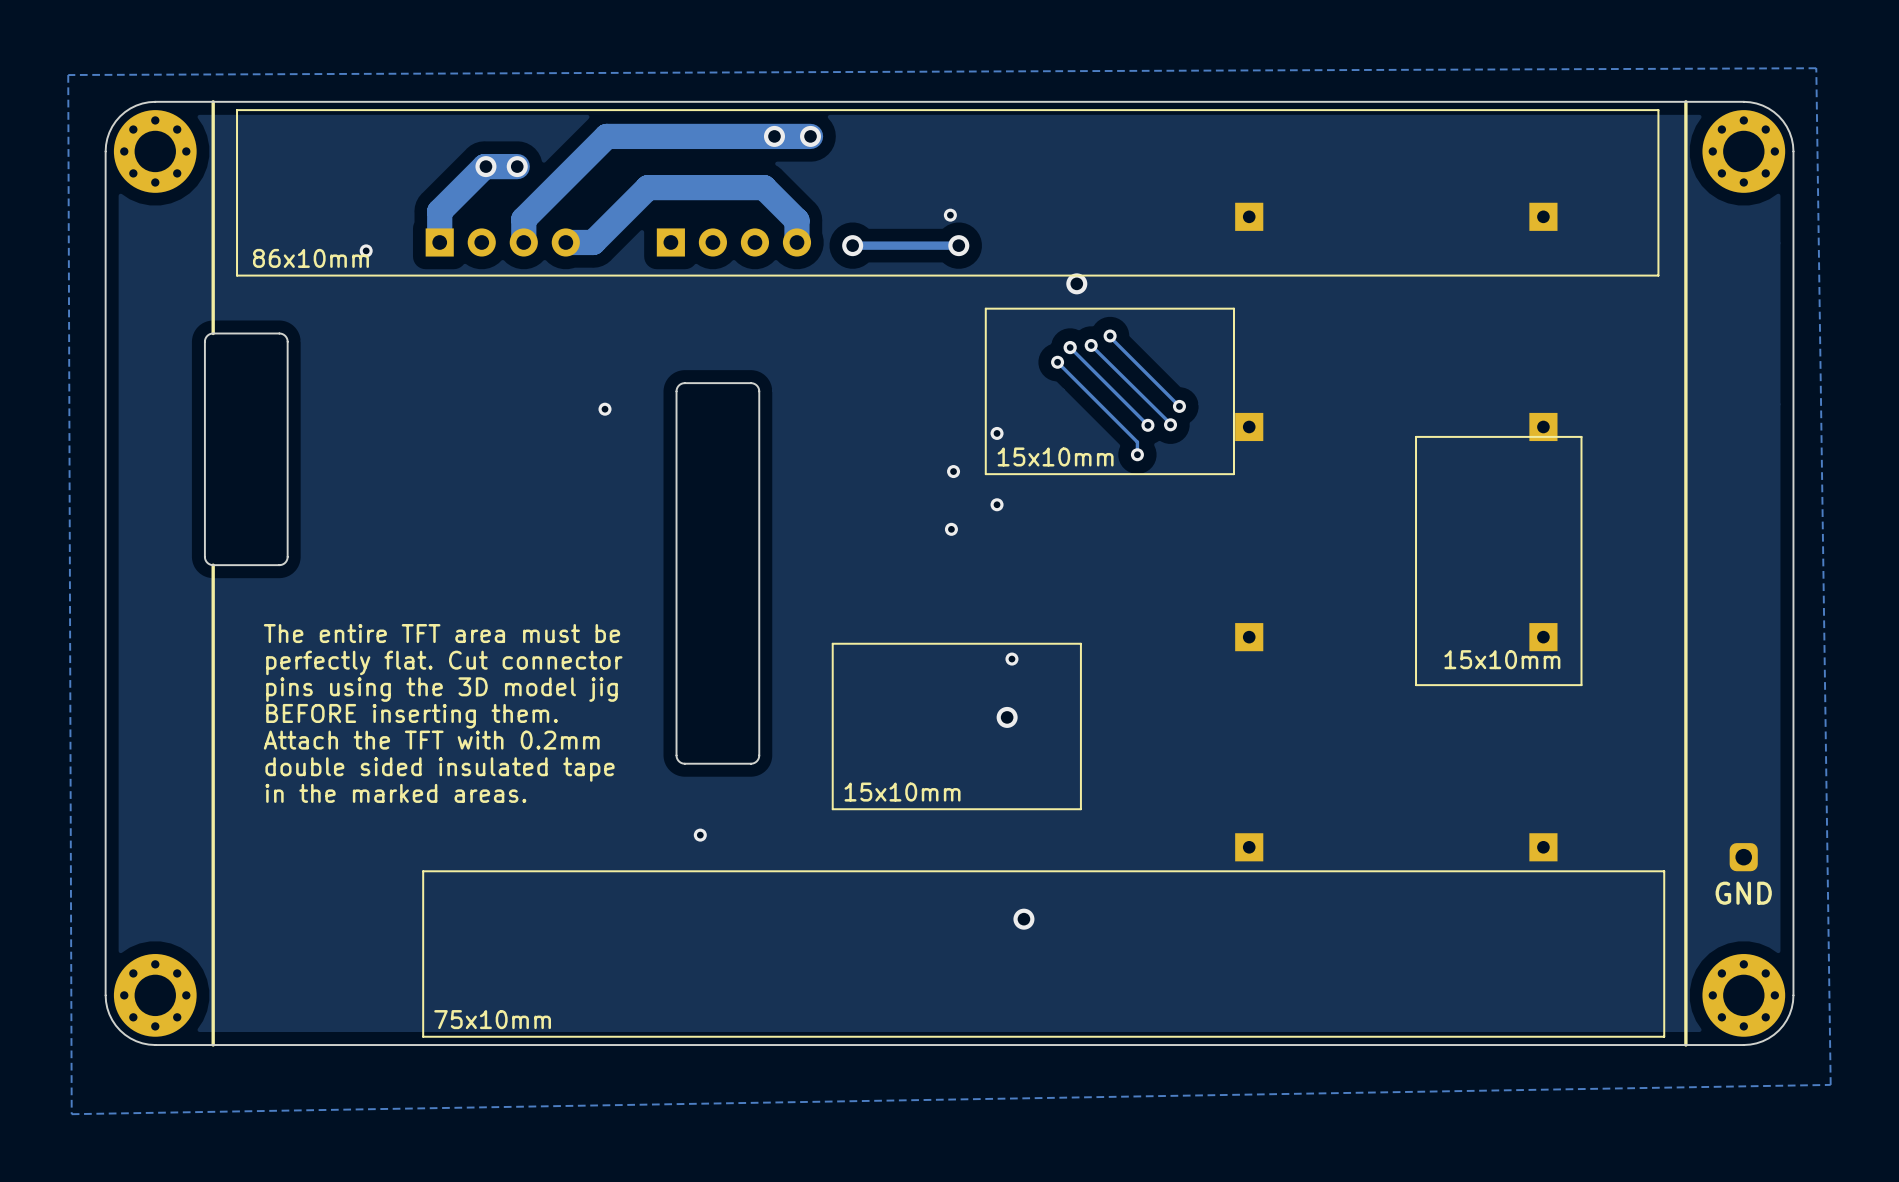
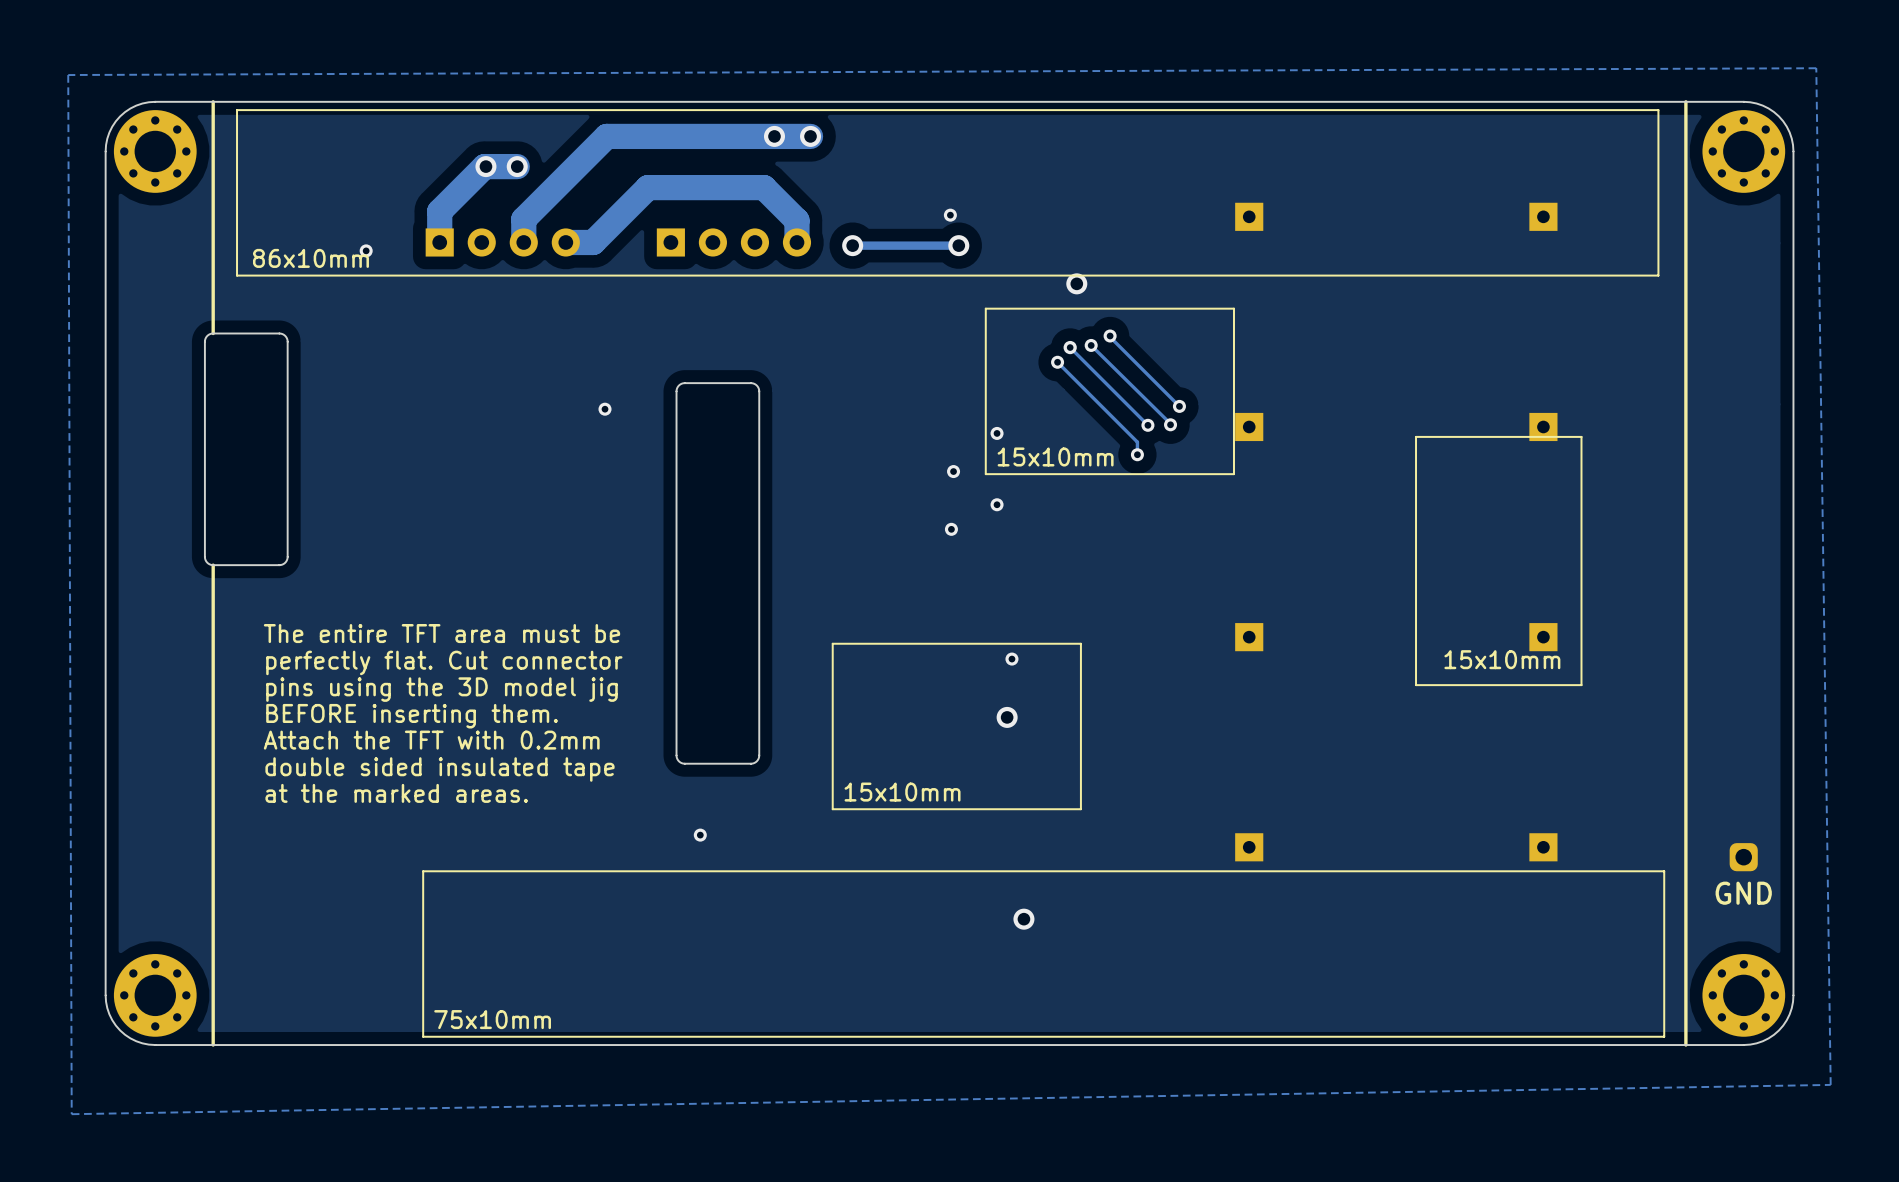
text: in the marked areas. (395, 793) -> at the marked areas. (396, 793)

